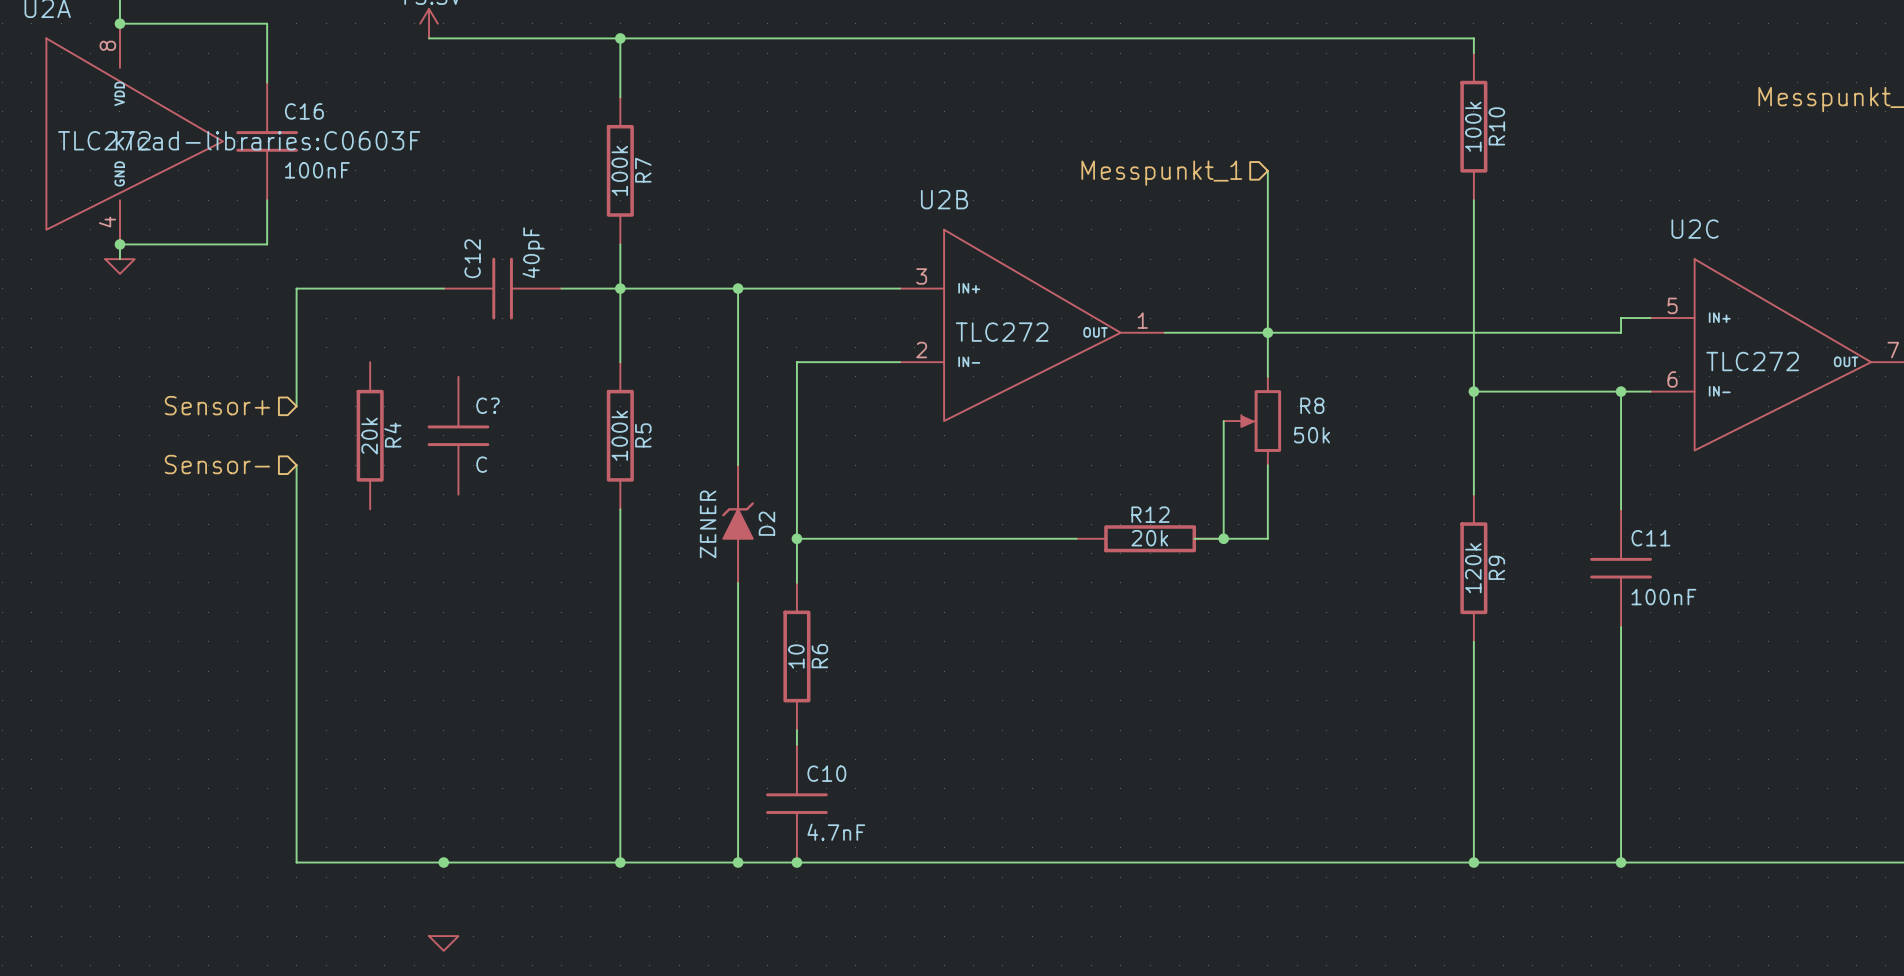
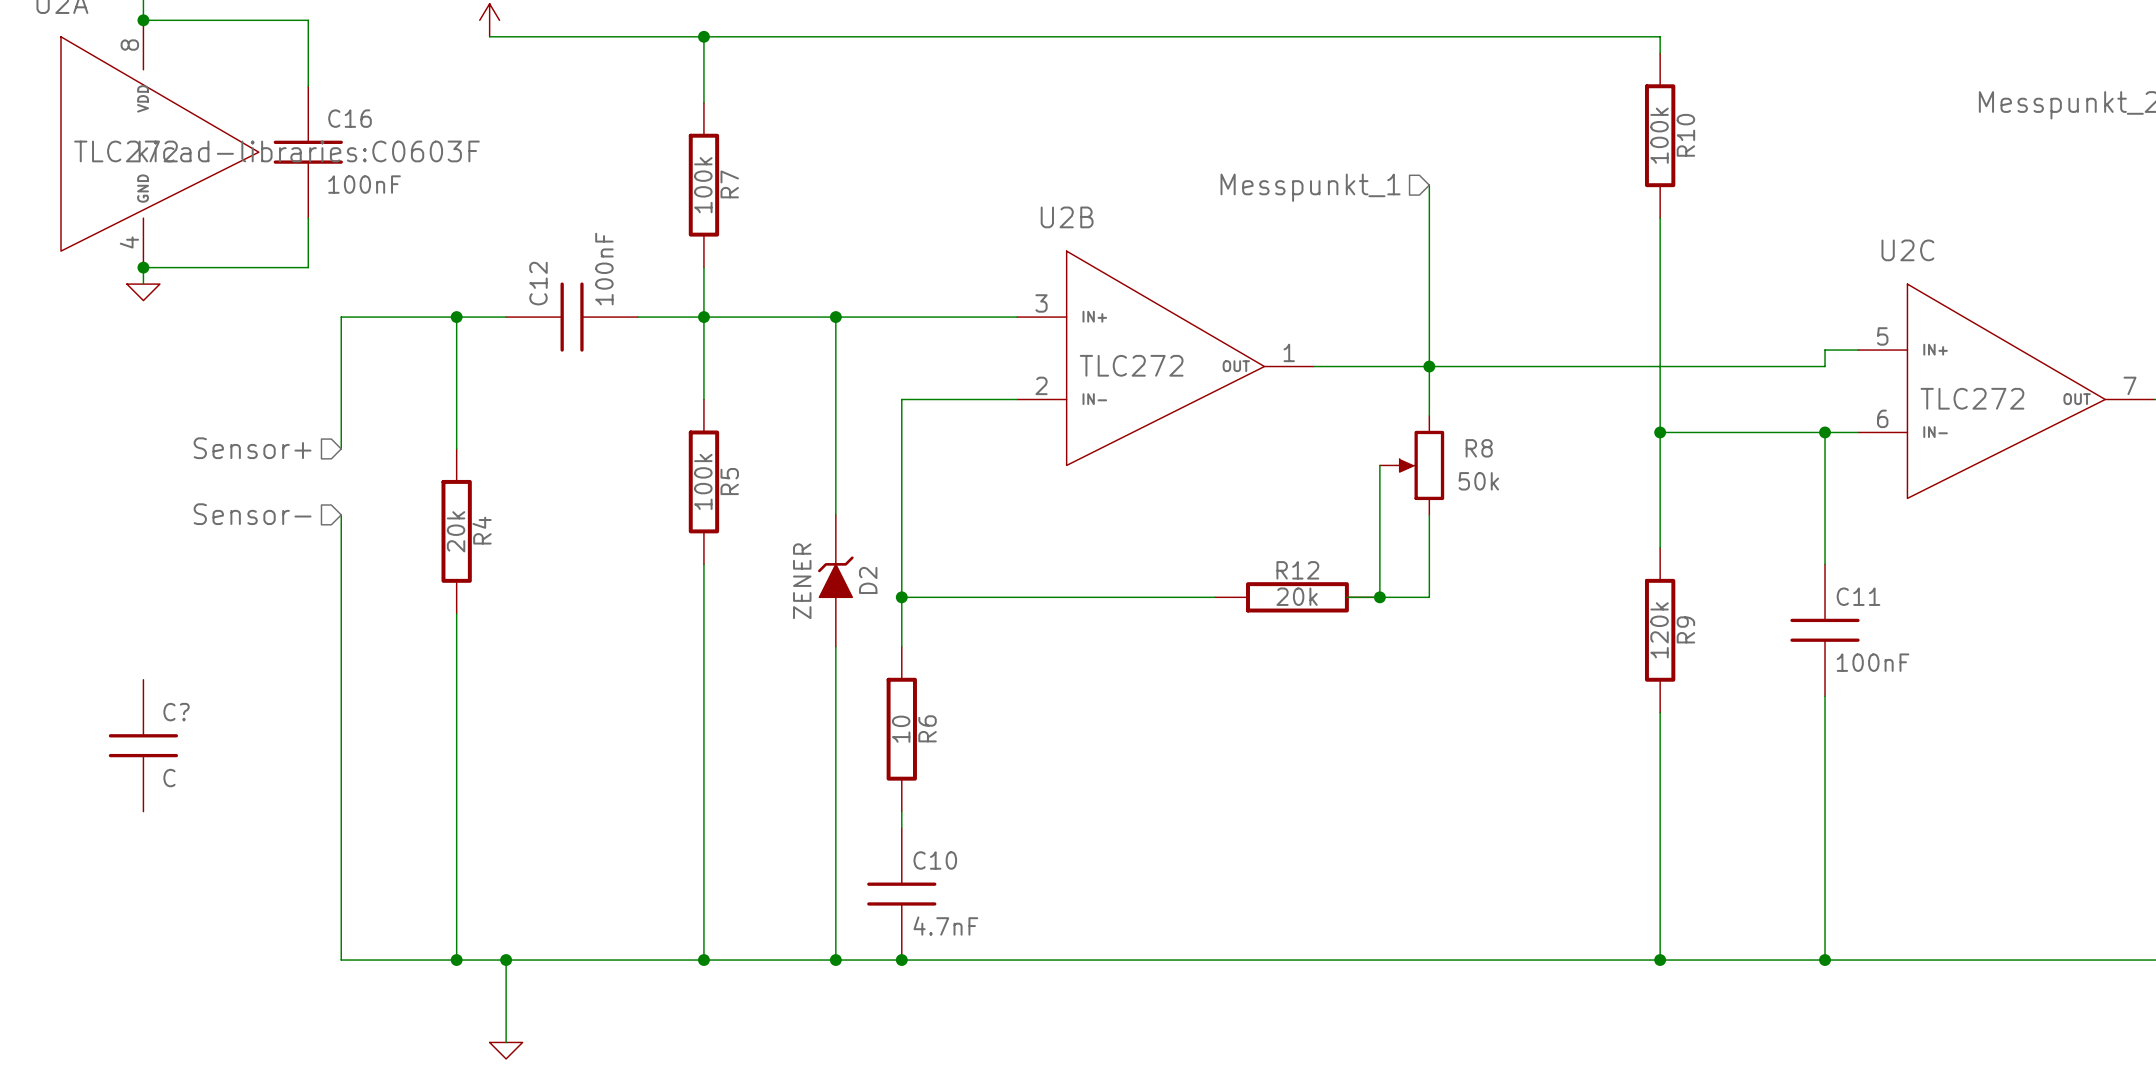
C12 value: 40pF (533, 252) -> 100nF (604, 269)
wire: none -> (456, 317) (456, 448)
junction: none -> (456, 317)
R4 position: (370, 435) -> (456, 531)
C?: C (458, 435) -> none
wire: none -> (456, 613) (456, 960)
C?: none -> C (143, 745)
junction: none -> (456, 960)
wire: none -> (506, 960) (506, 1042)

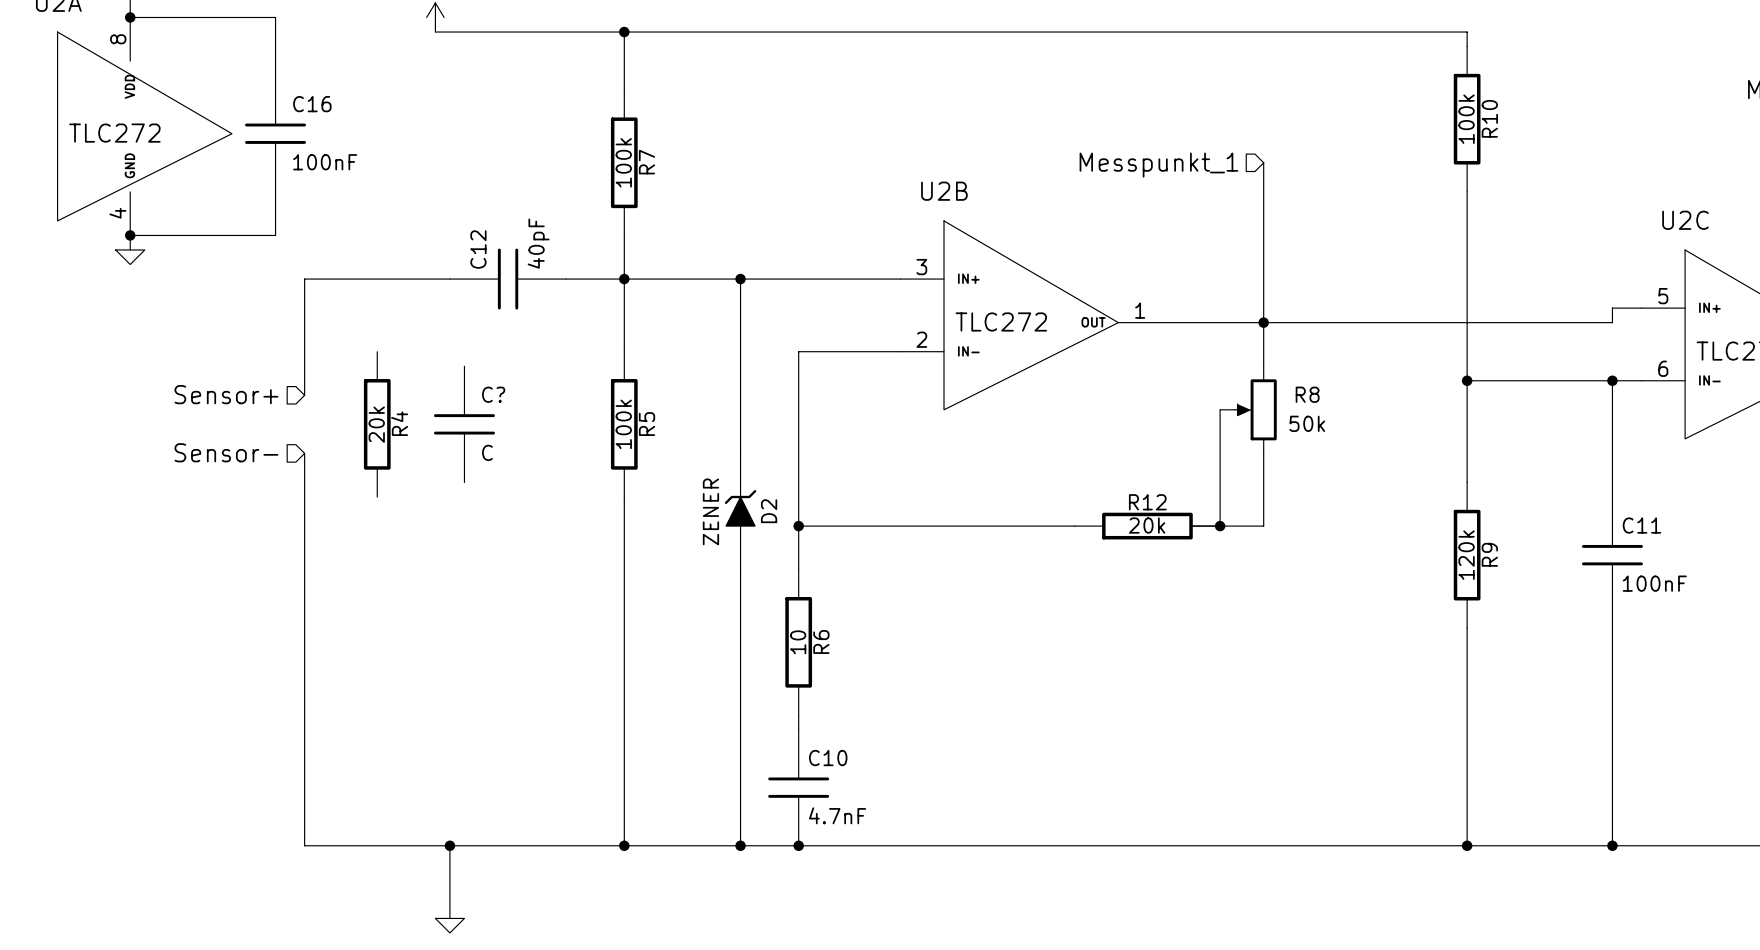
C16 text: kicad-libraries:C0603F (309, 151) -> none
C12 value: 100nF (604, 269) -> 40pF (538, 243)
wire: (456, 317) (456, 448) -> none
junction: (456, 317) -> none
C?: none -> C (464, 424)
R4 position: (456, 531) -> (377, 424)
wire: (456, 613) (456, 960) -> none
C?: C (143, 745) -> none
junction: (456, 960) -> none

